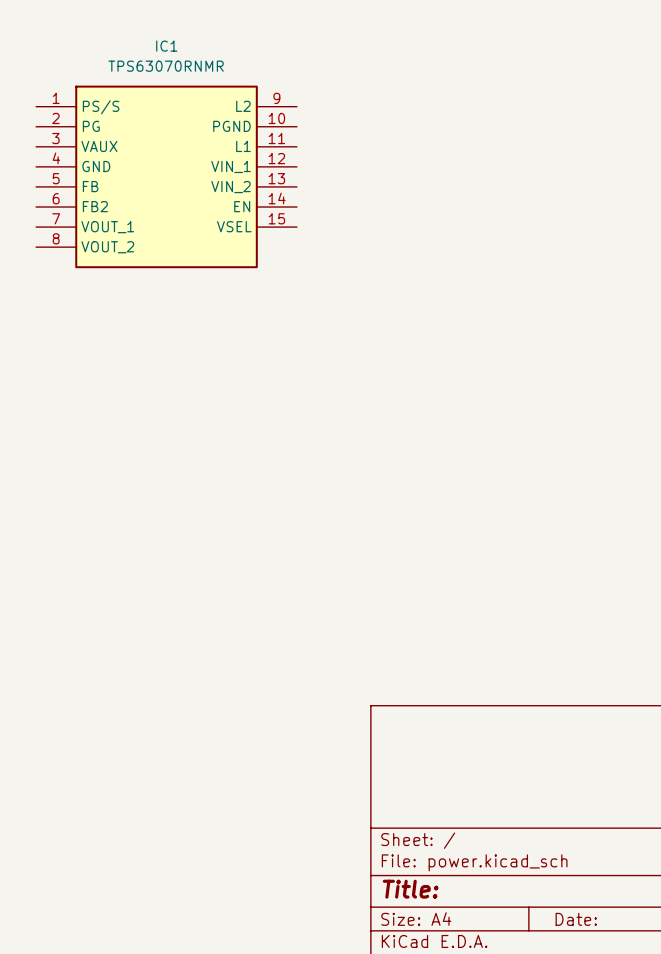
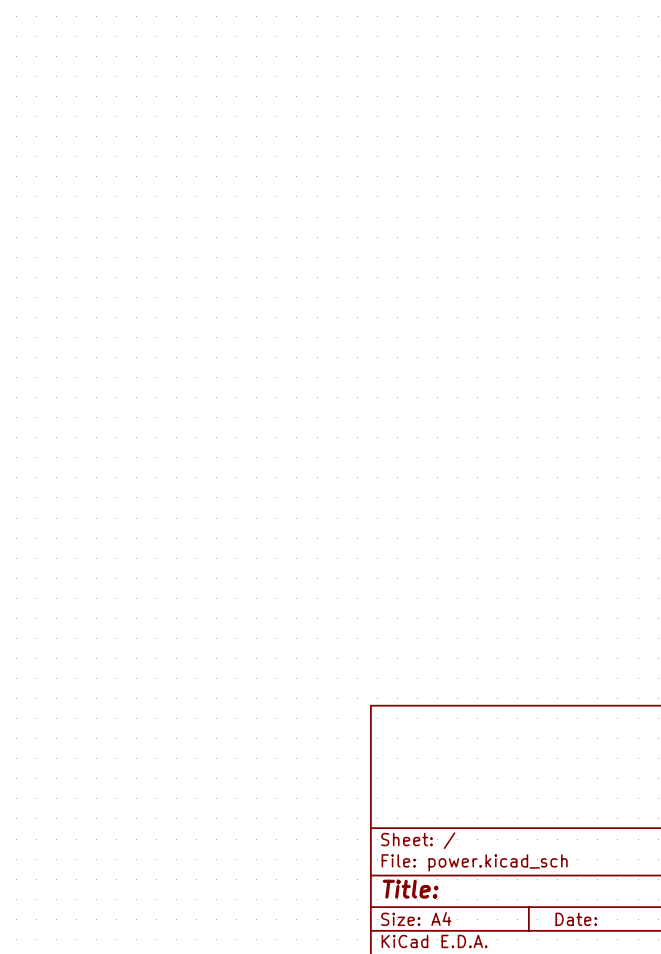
IC1: TPS63070RNMR (166, 176) -> none

